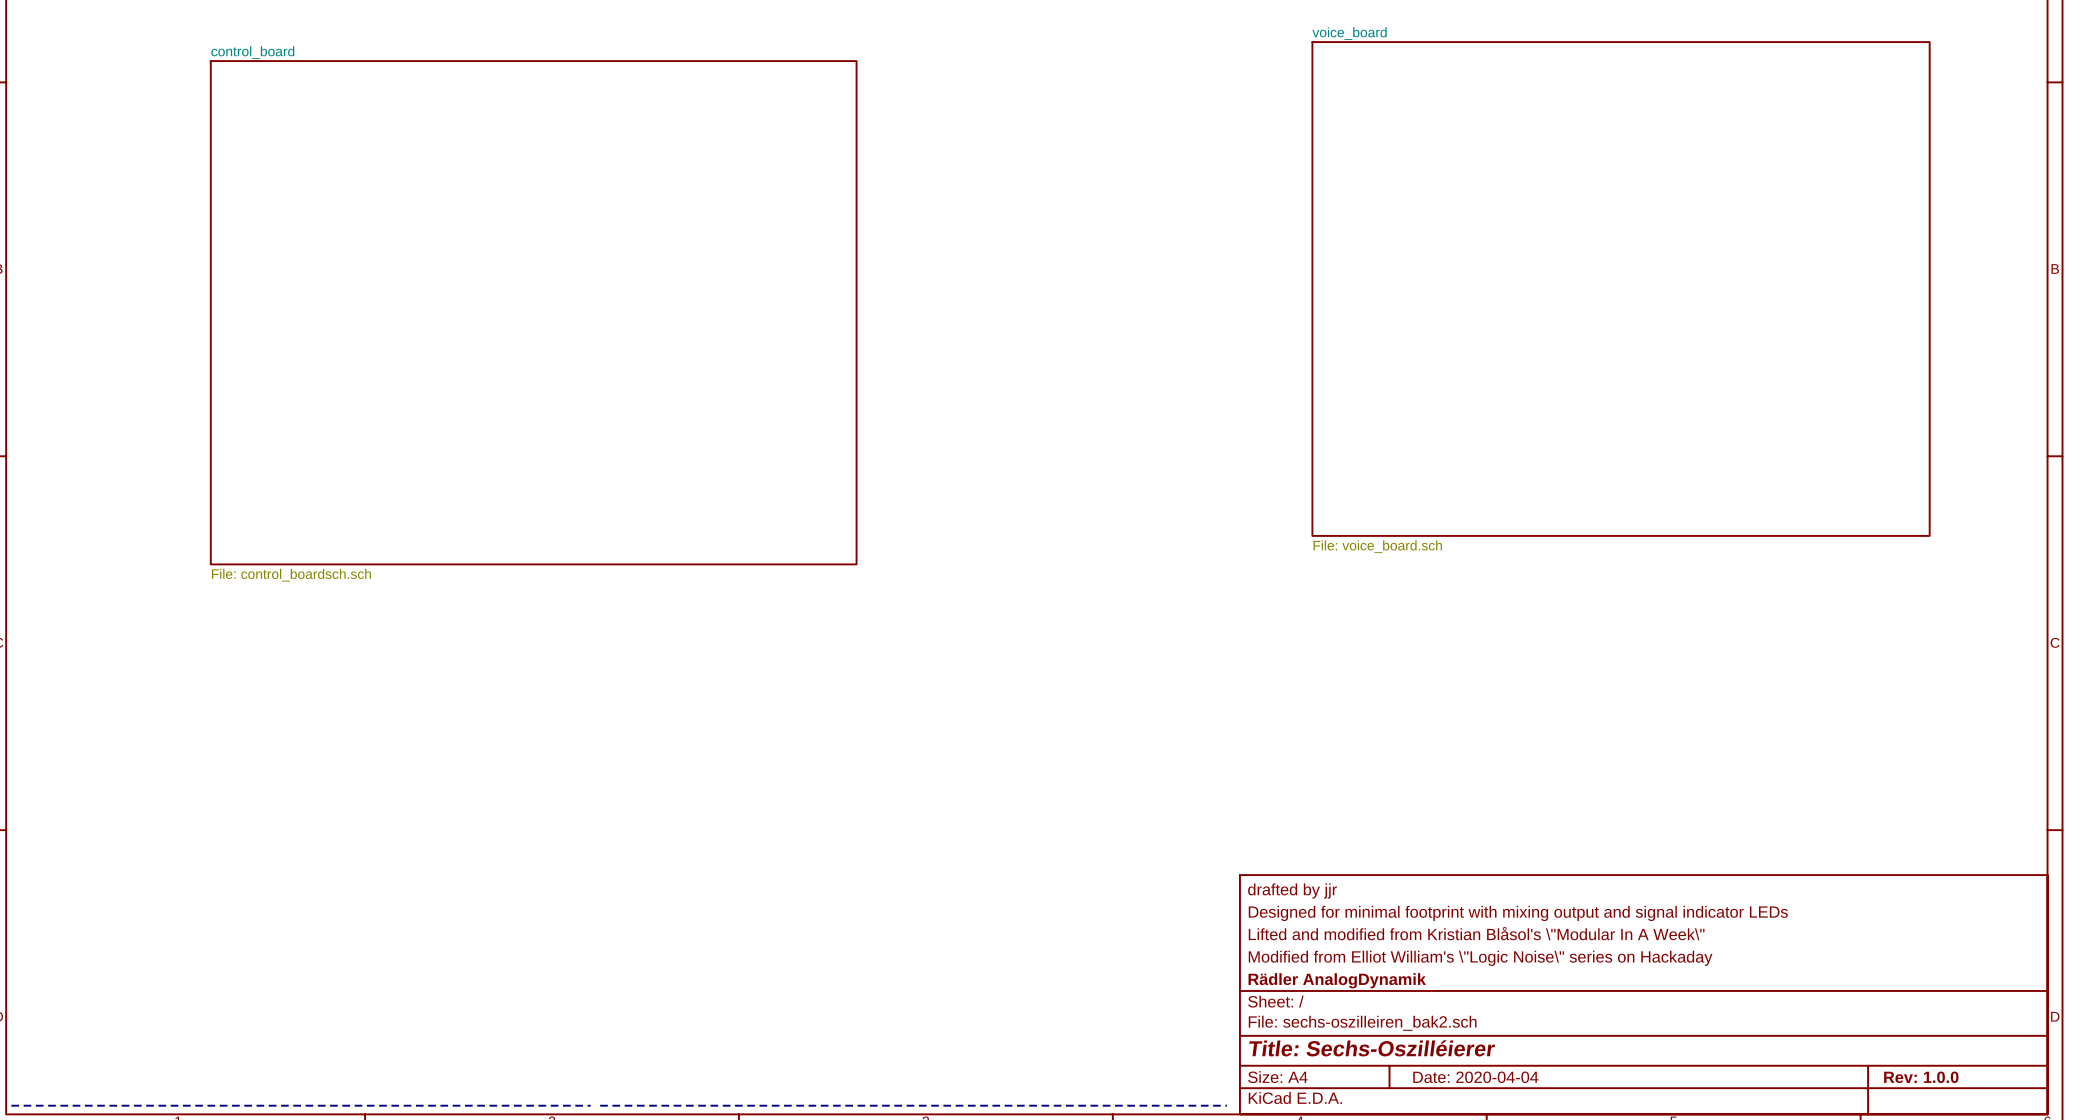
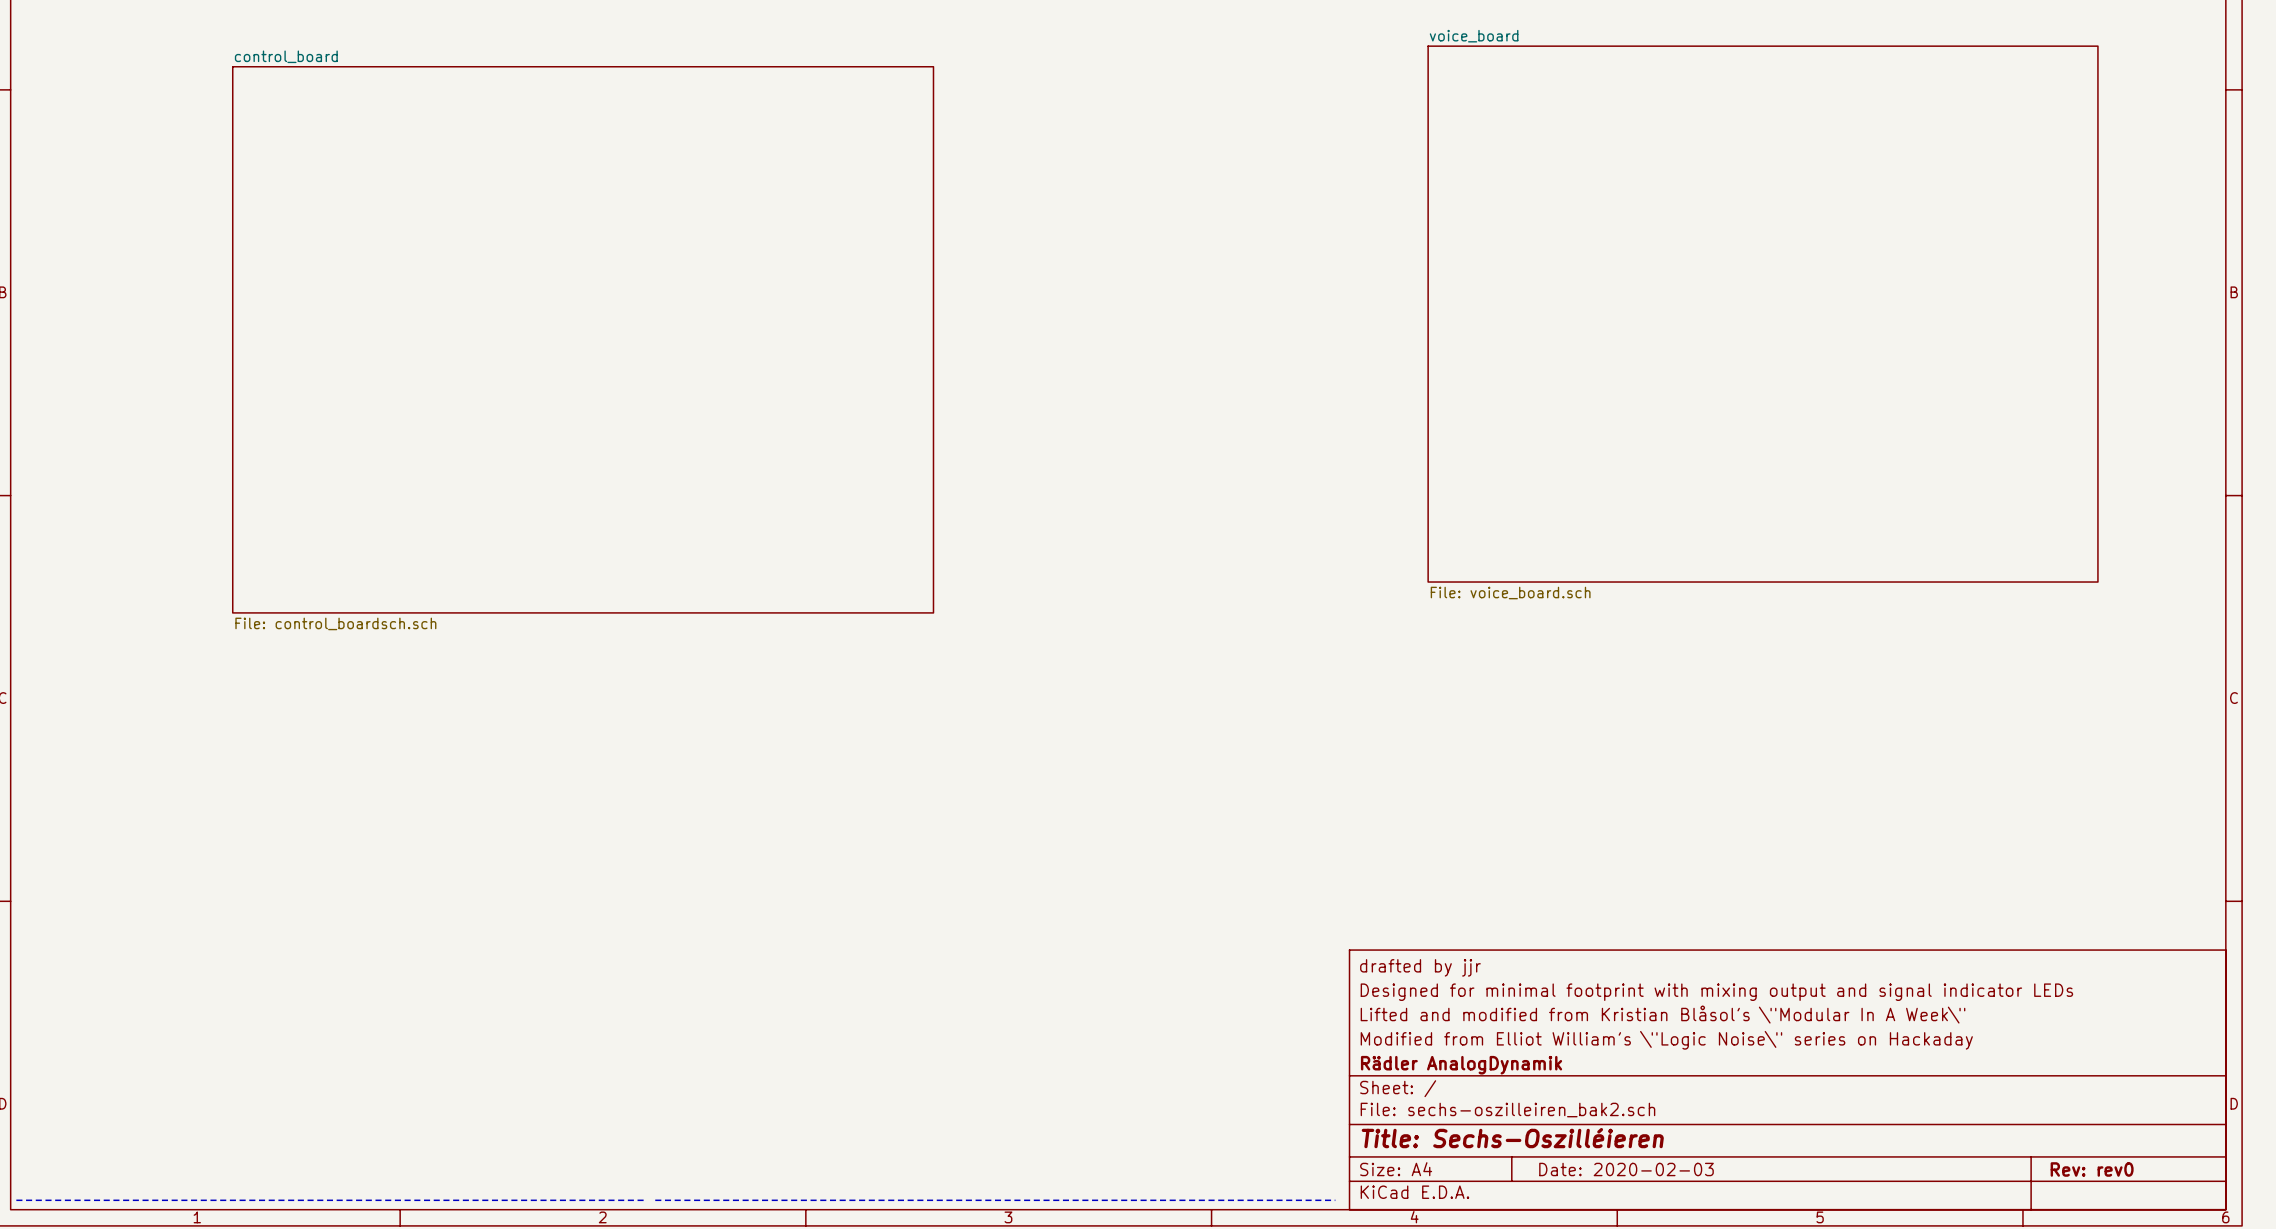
title block: Title: Sechs-Oszilléierer (1372, 1048) -> Title: Sechs-Oszilléieren (1512, 1138)
title block: Date: 2020-04-04 (1475, 1077) -> Date: 2020-02-03 (1626, 1169)
title block: Rev: 1.0.0 (1921, 1077) -> Rev: rev0 (2092, 1169)

